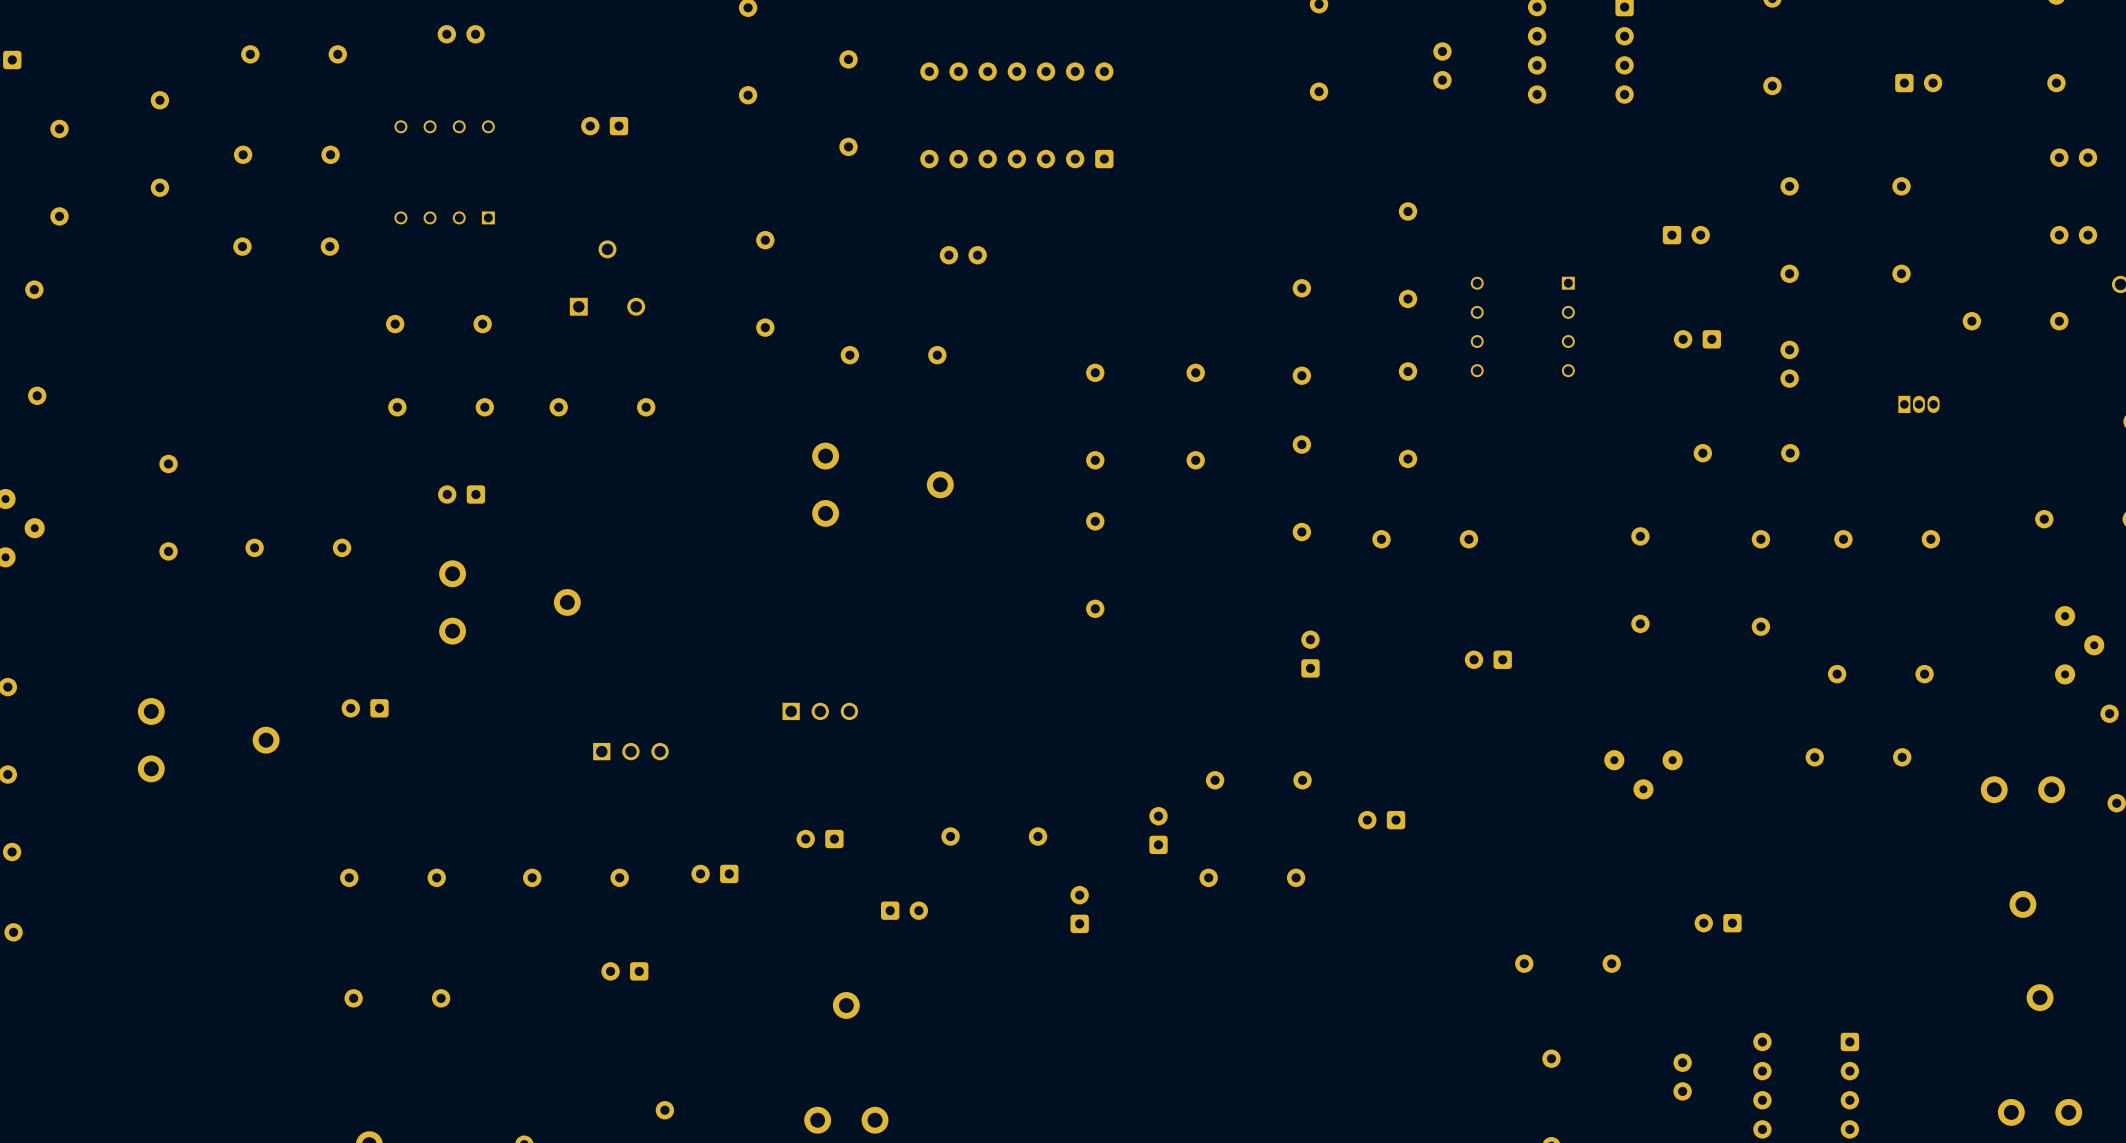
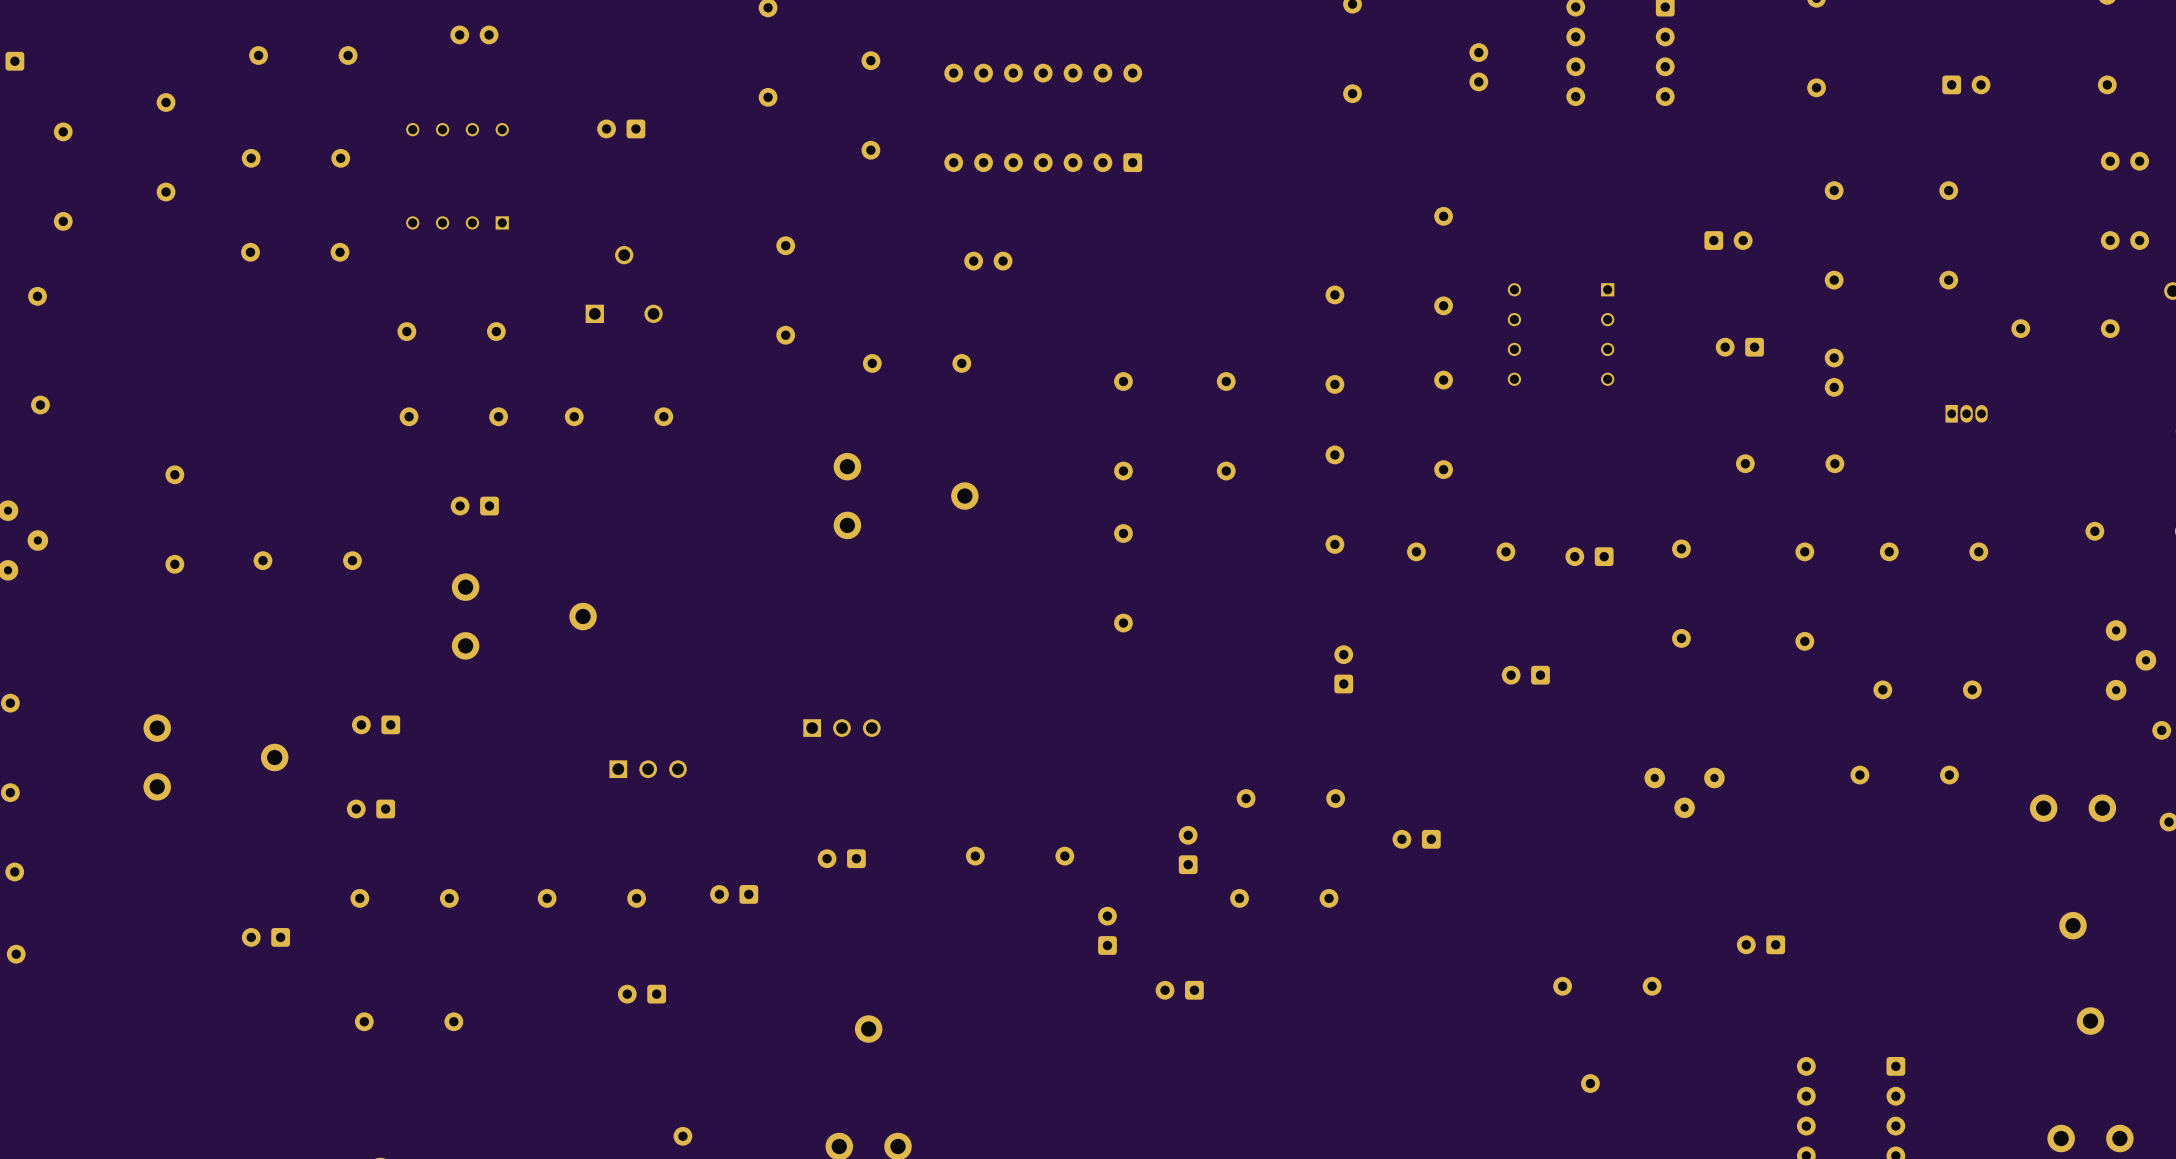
part: none -> (1589, 556)
part: none -> (370, 809)
part rotation: 0° (904, 910) -> 180° (1179, 990)
part position: (904, 910) -> (1179, 990)
part: none -> (265, 937)
part: (1682, 1077) -> none

